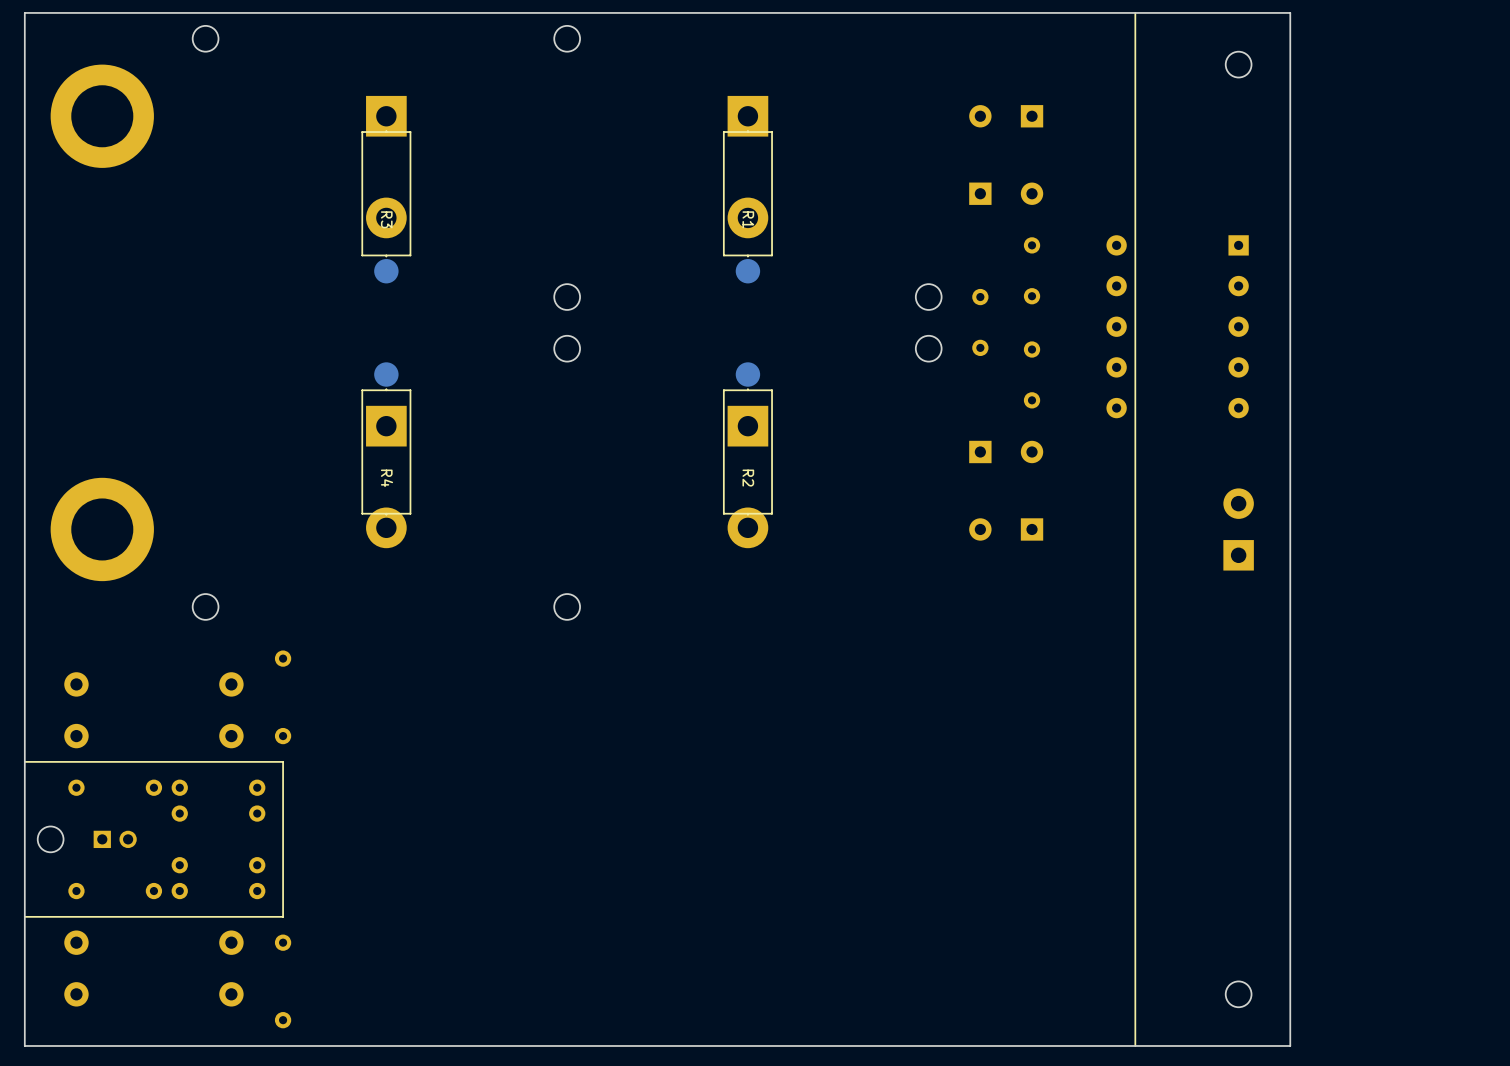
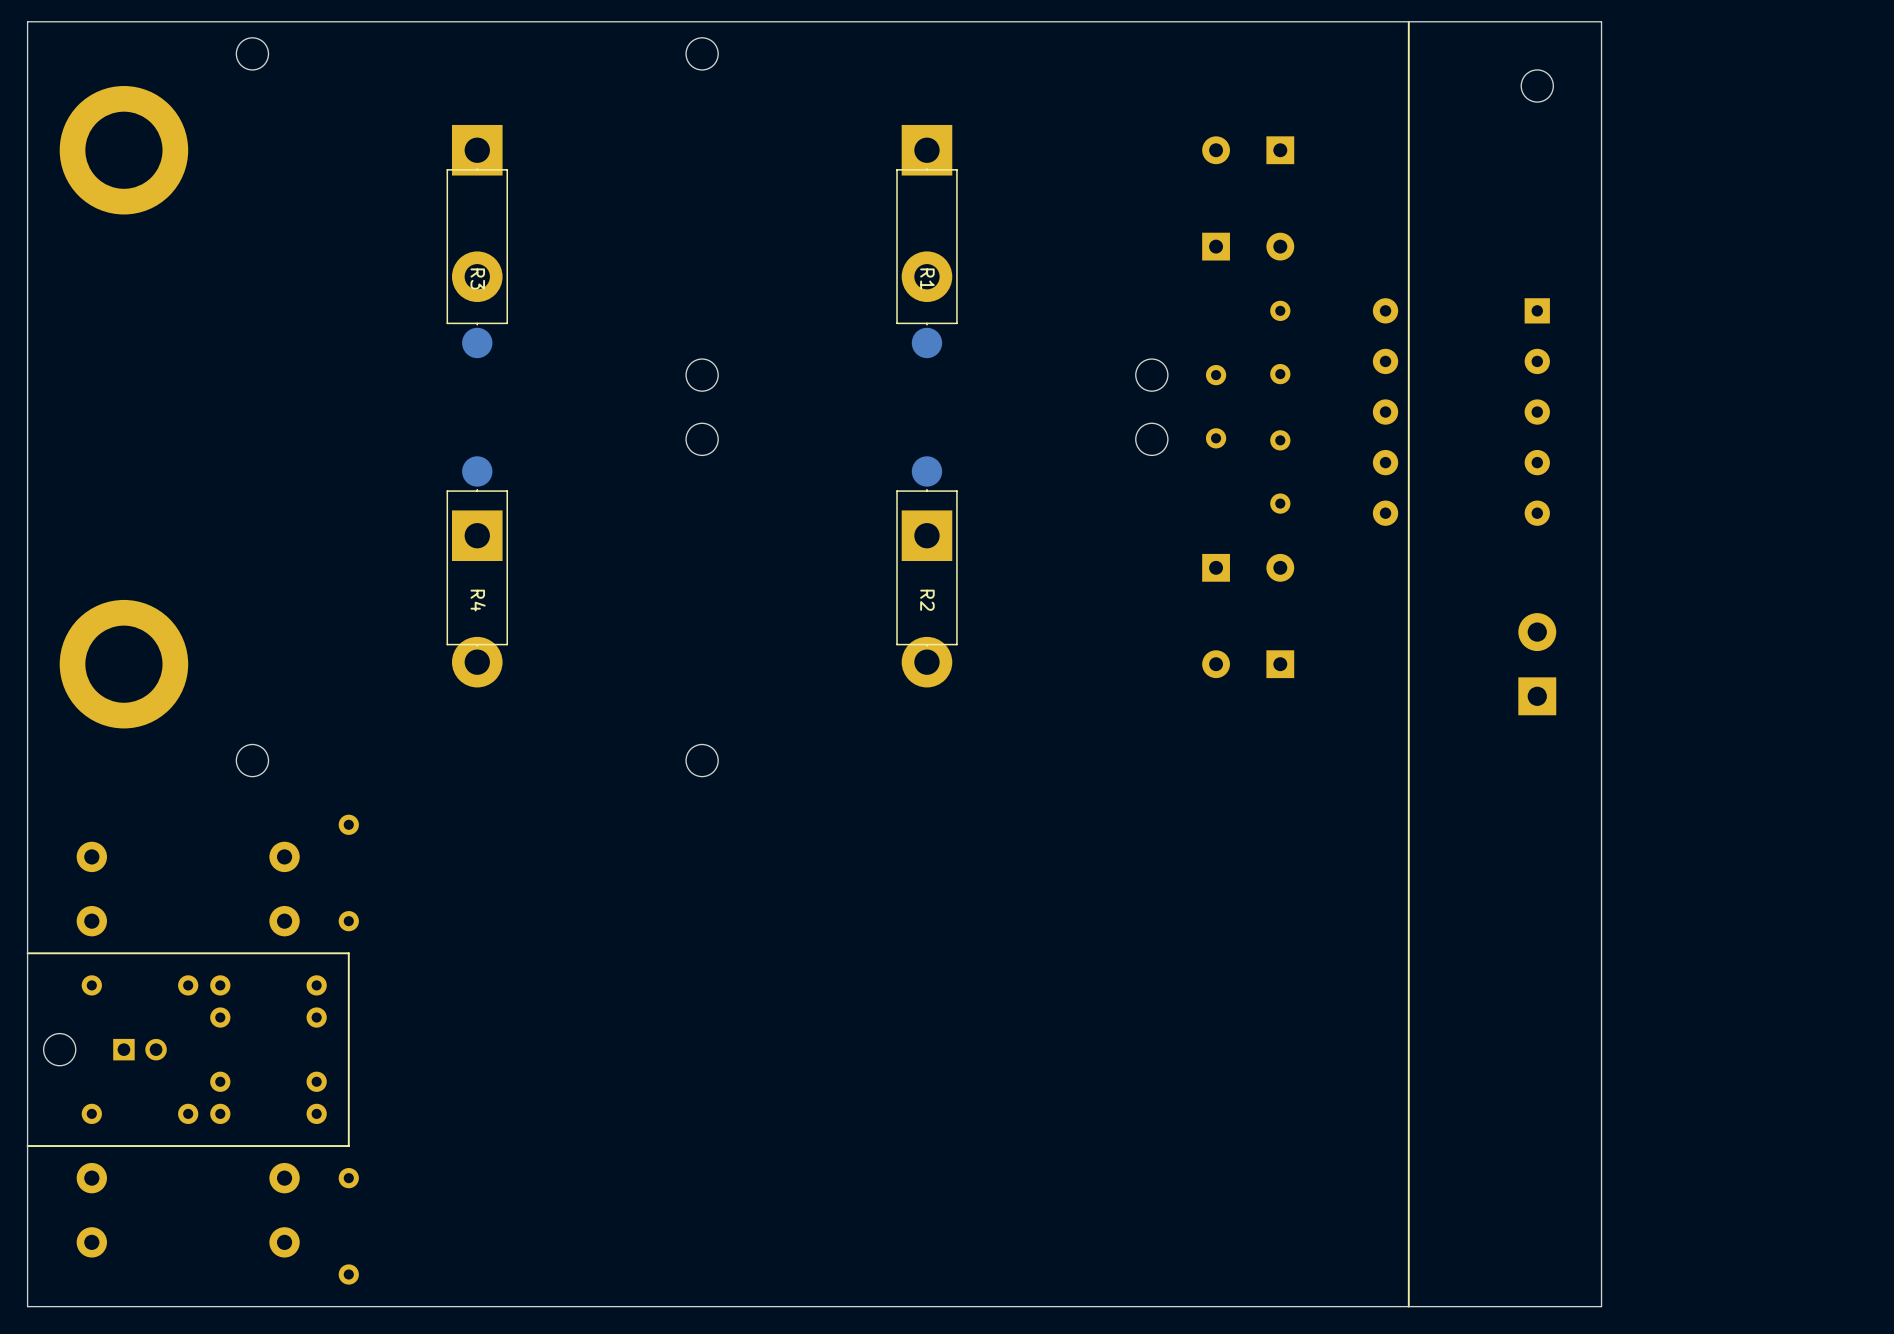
round board edge: [1225, 981, 1252, 1008] -> none

